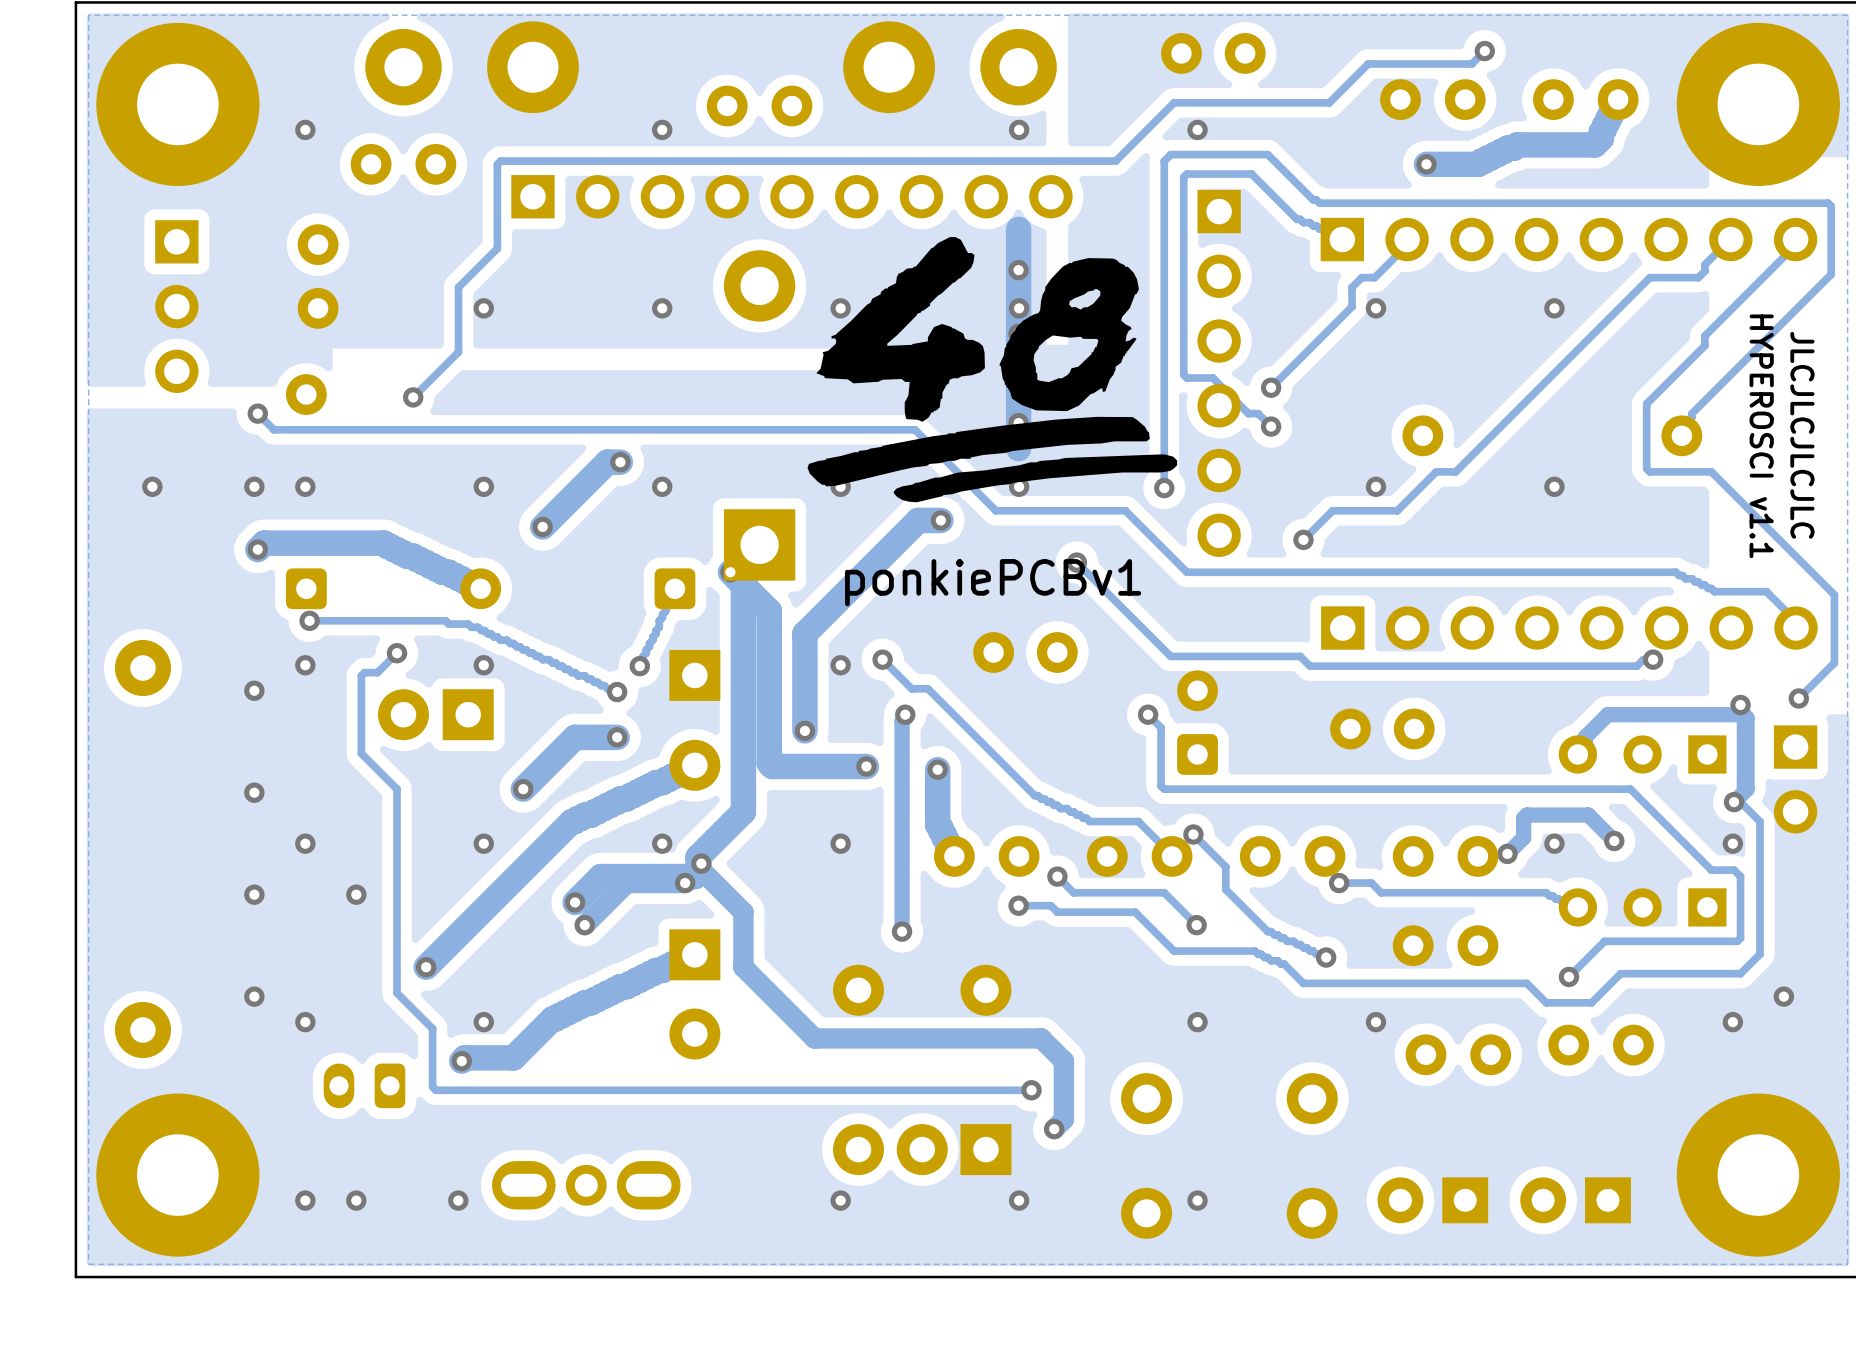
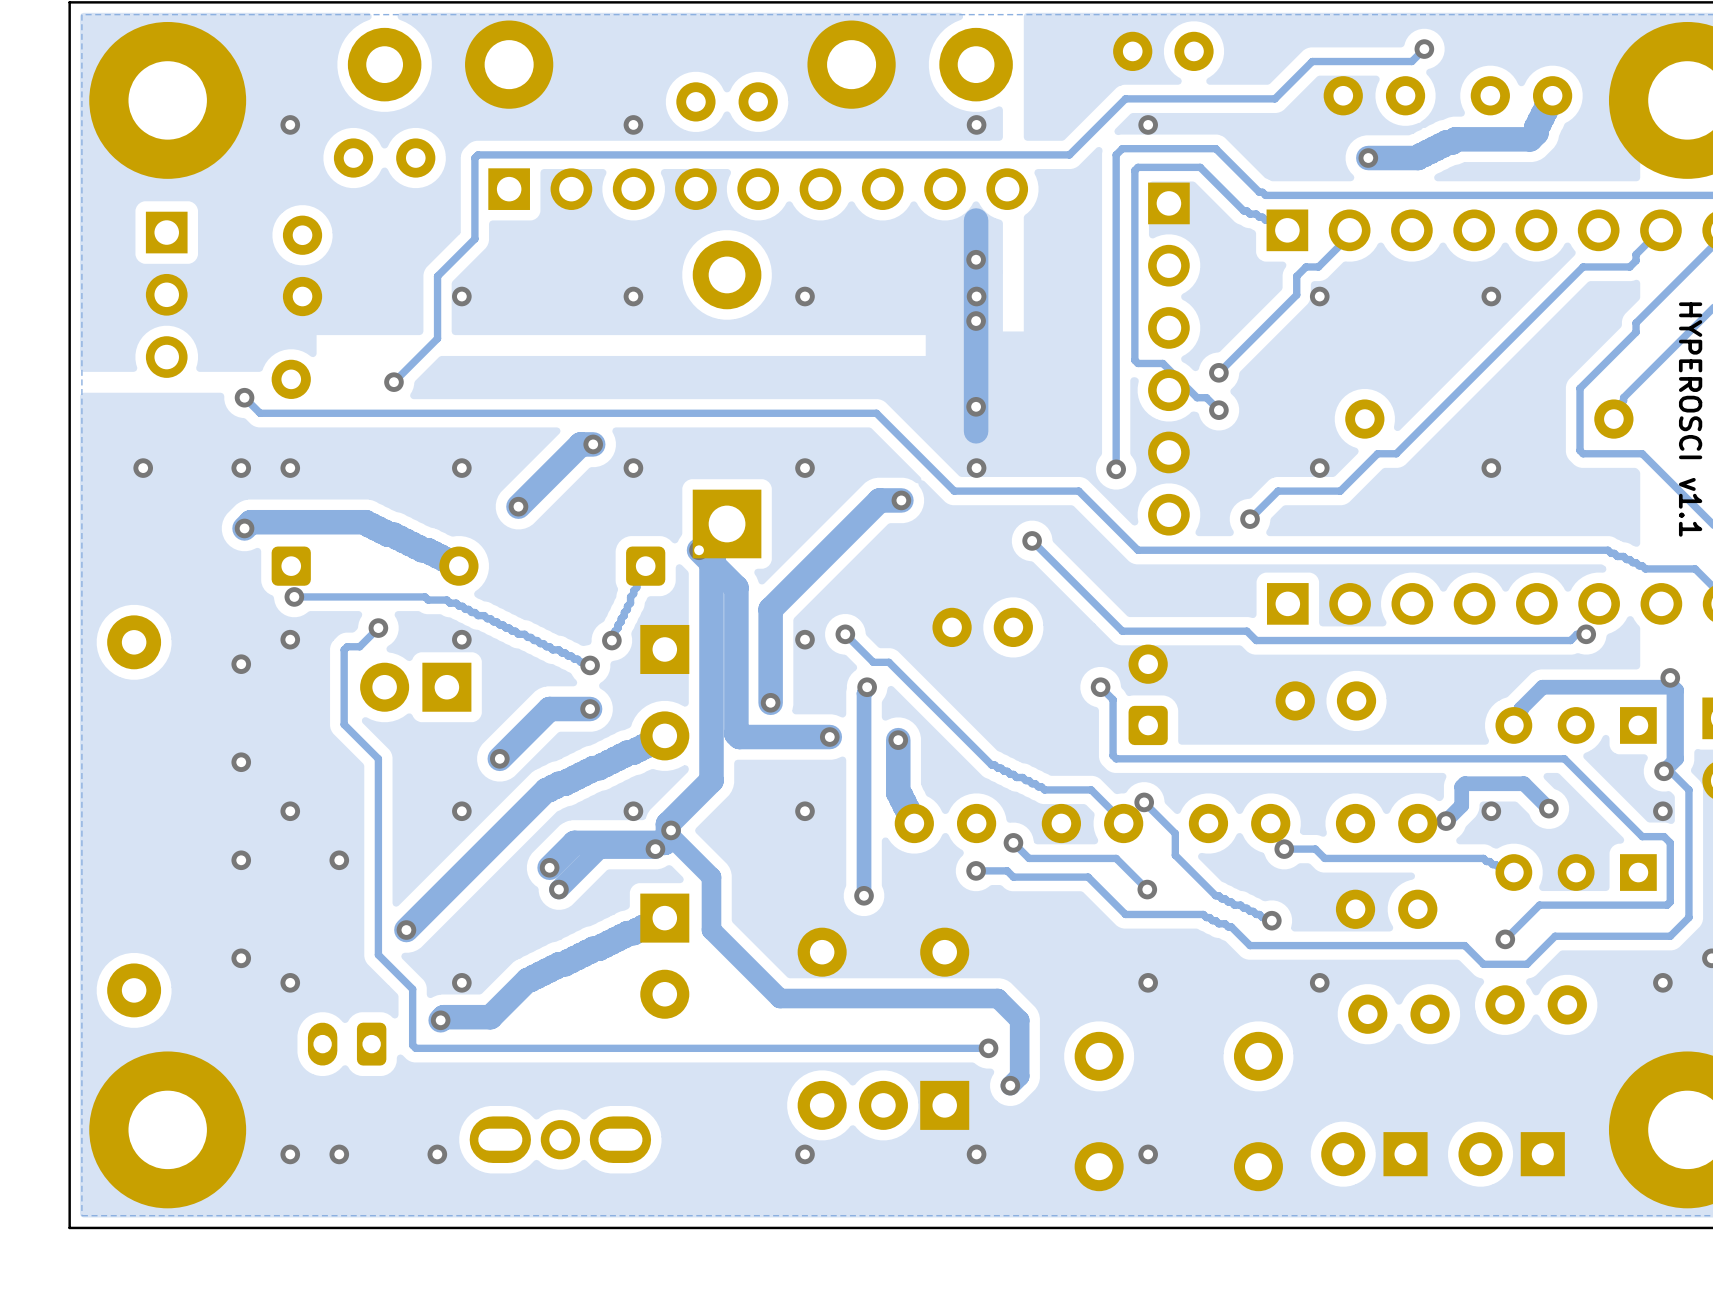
drawing: [807, 236, 1178, 503] -> none
text: ponkiePCBv1 (993, 582) -> none

